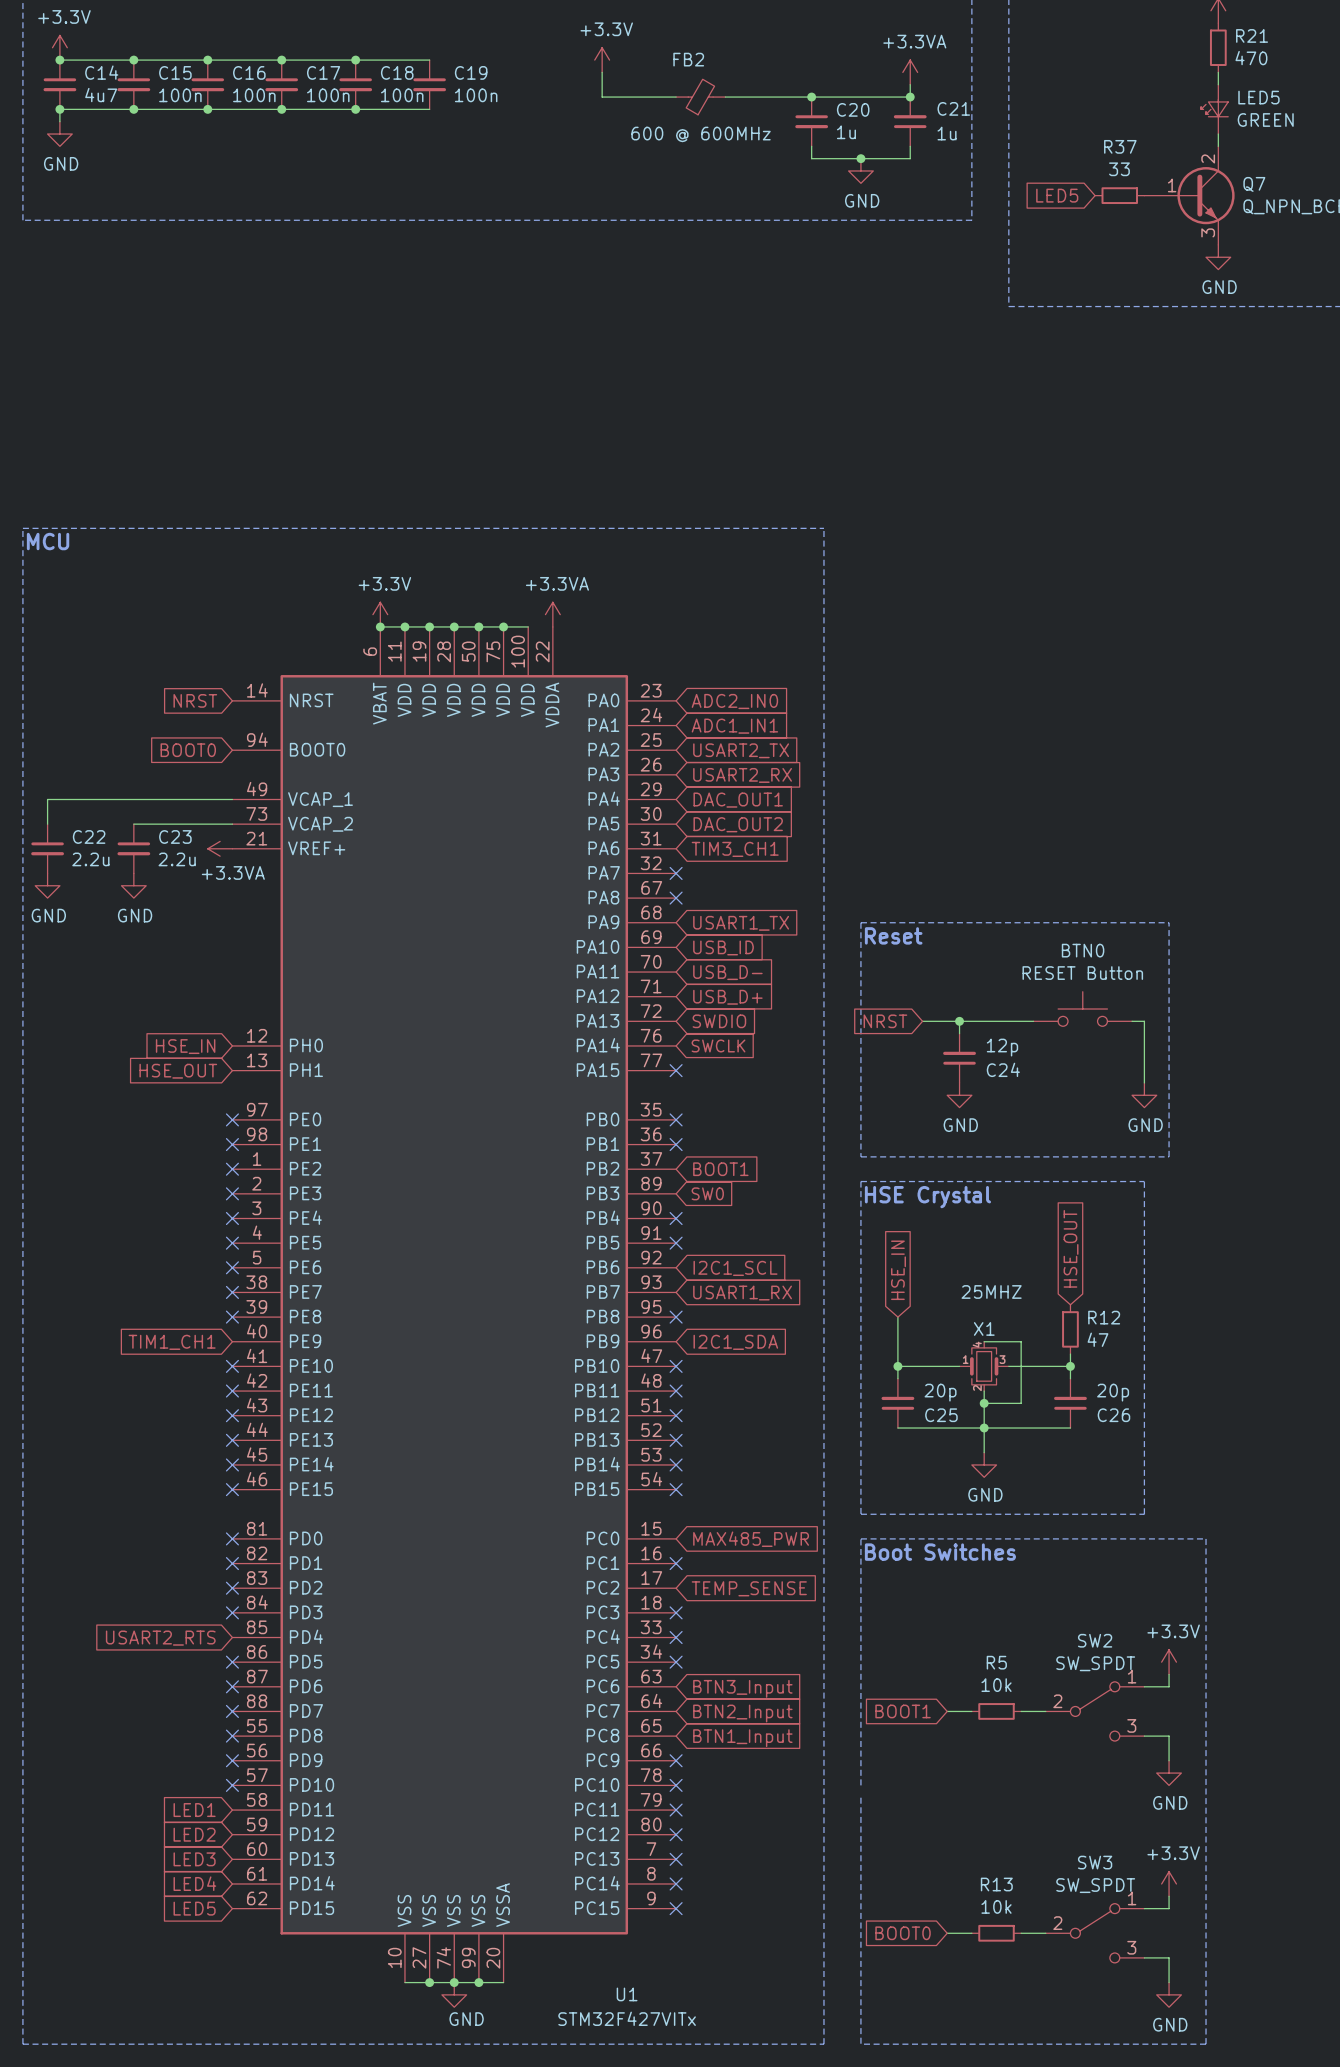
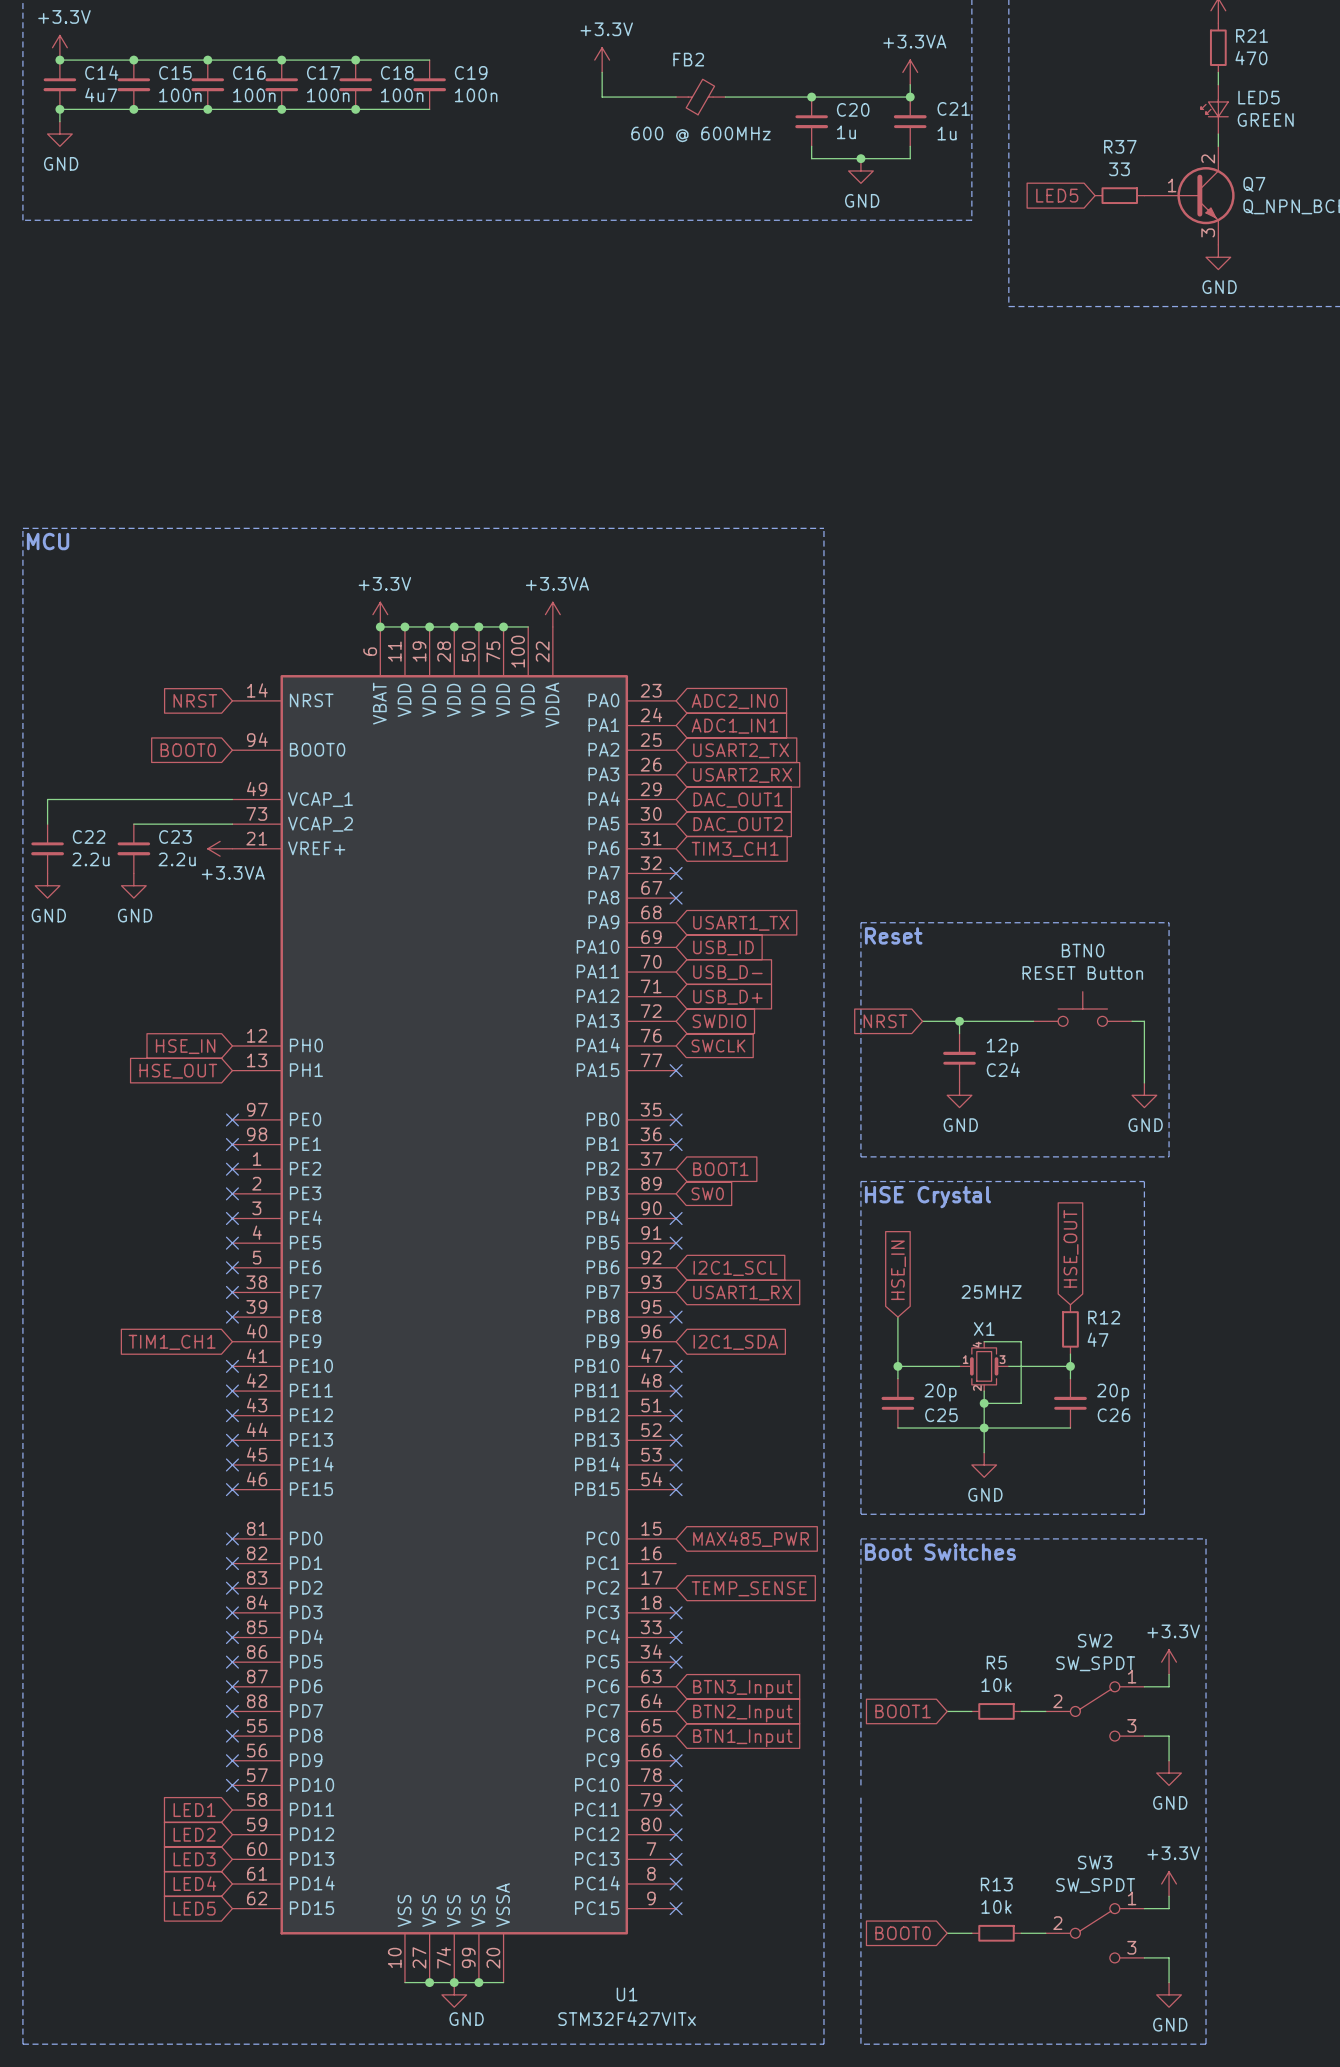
no-connect mark: (676, 1563) -> none
no-connect mark: none -> (232, 1637)
global label: USART2_RTS (160, 1638) -> none

